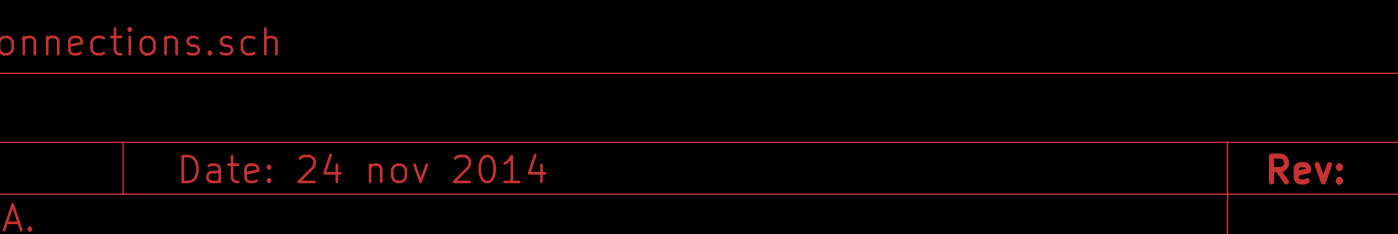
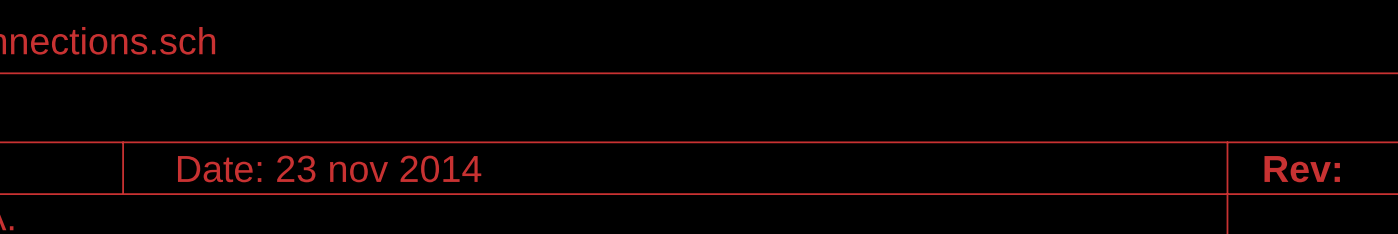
title block: Date: 24 nov 2014 (363, 168) -> Date: 23 nov 2014 (329, 168)

